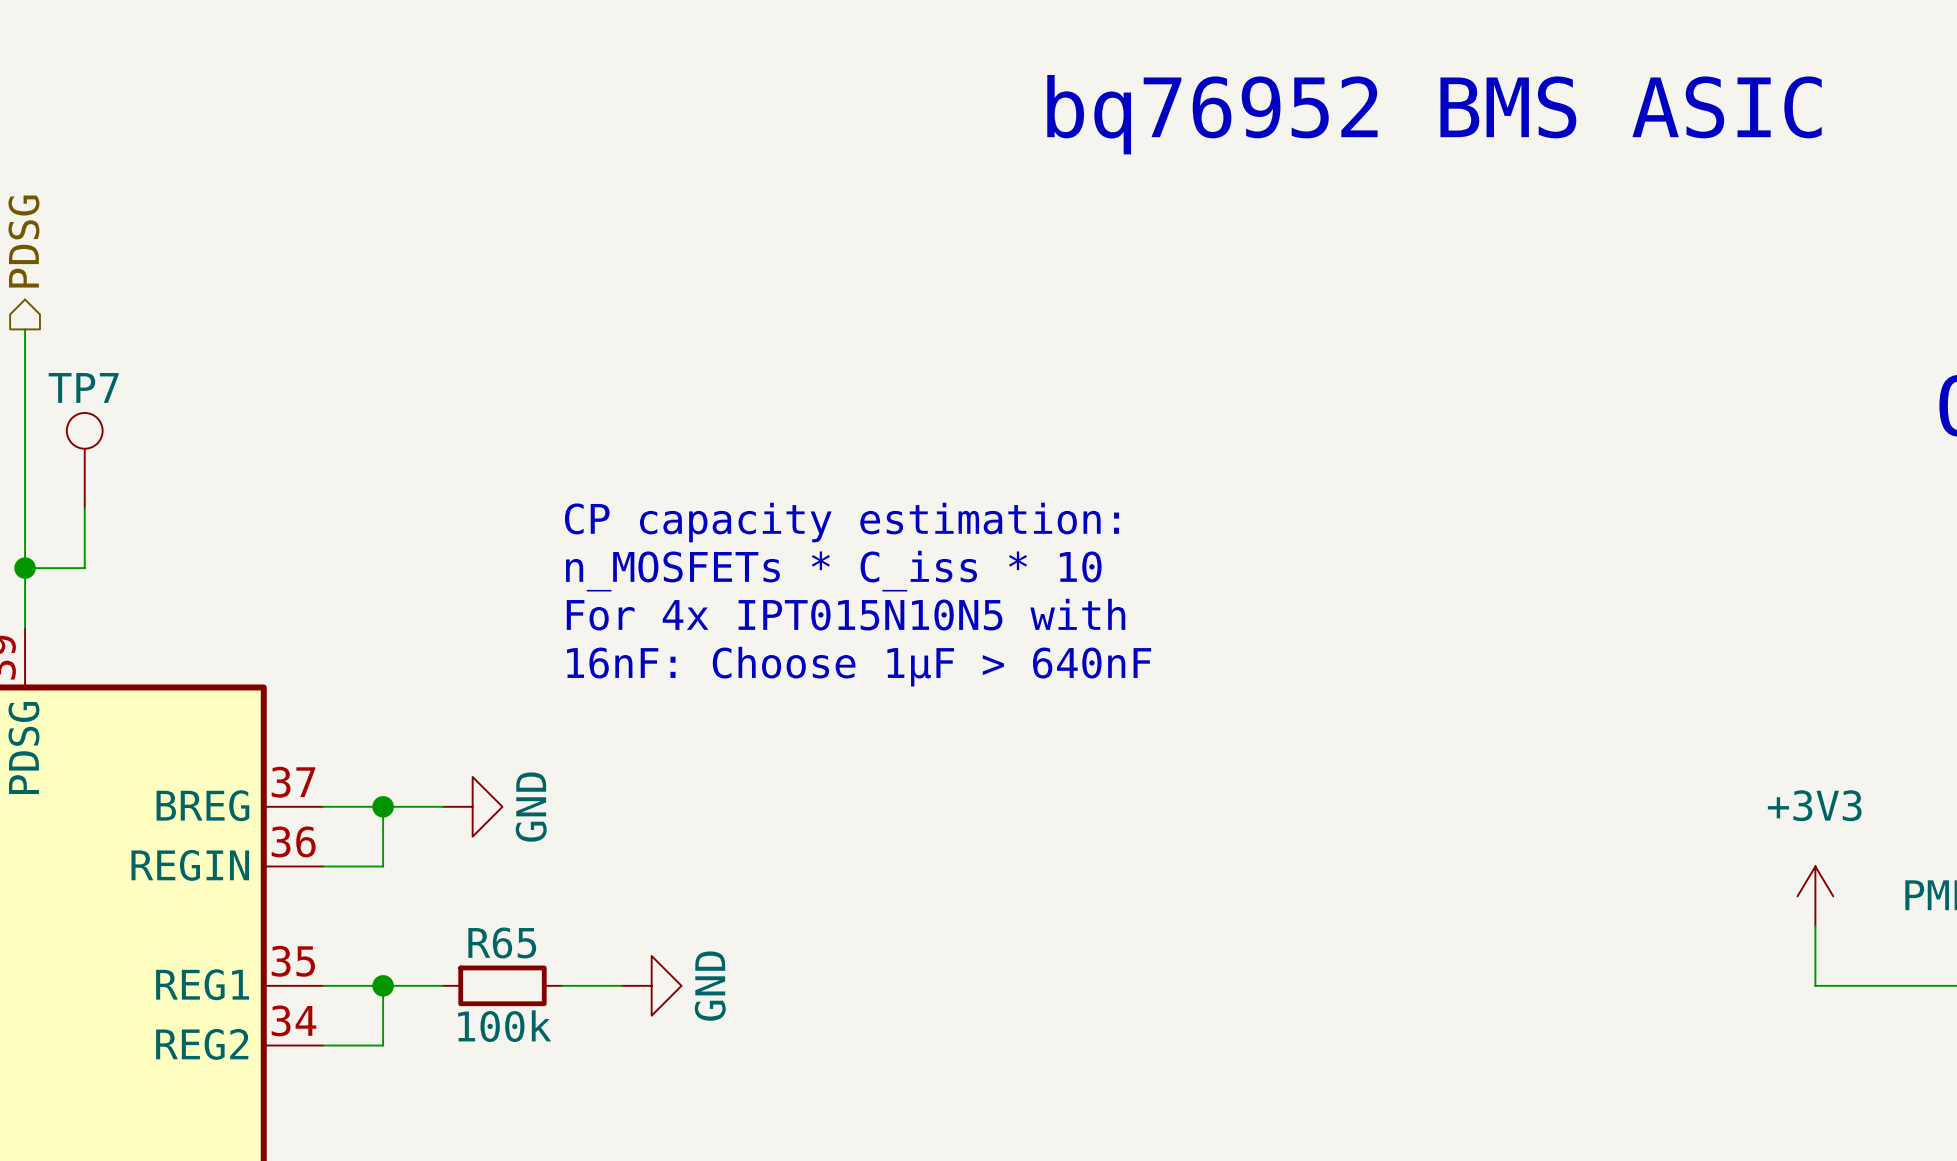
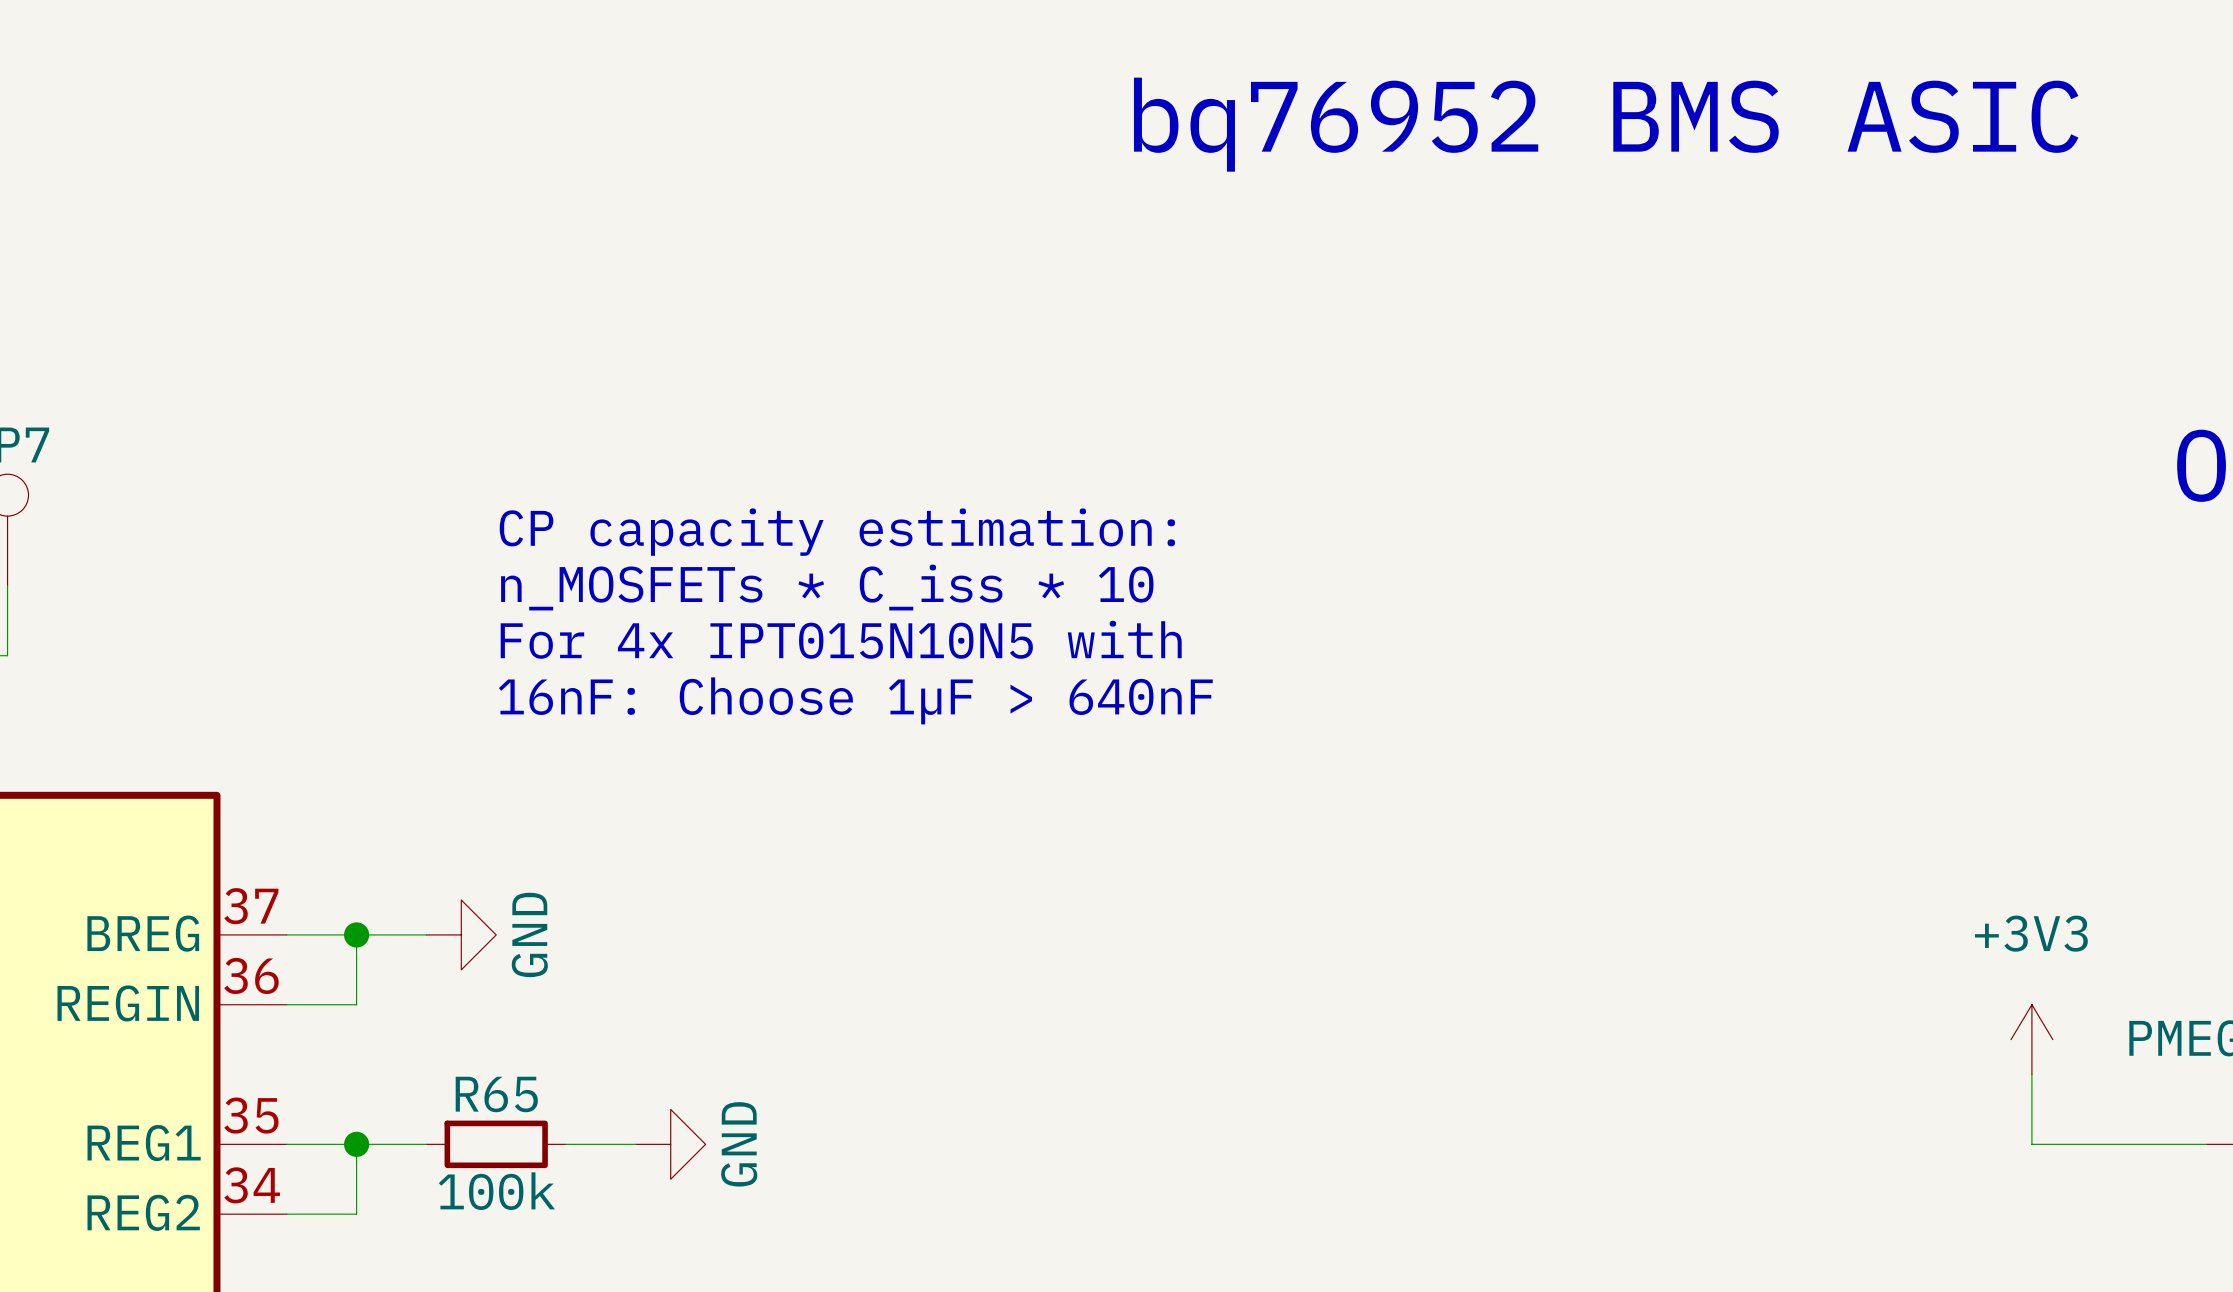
text position: CP capacity estimation: (841, 522) -> CP capacity estimation: (837, 532)
text position: n_MOSFETs * C_iss * 10 (833, 571) -> n_MOSFETs * C_iss * 10 (827, 587)
text position: For 4x IPT015N10N5 with (846, 614) -> For 4x IPT015N10N5 with (841, 639)
text position: 16nF: Choose 1µF > 640nF (859, 666) -> 16nF: Choose 1µF > 640nF (855, 700)

